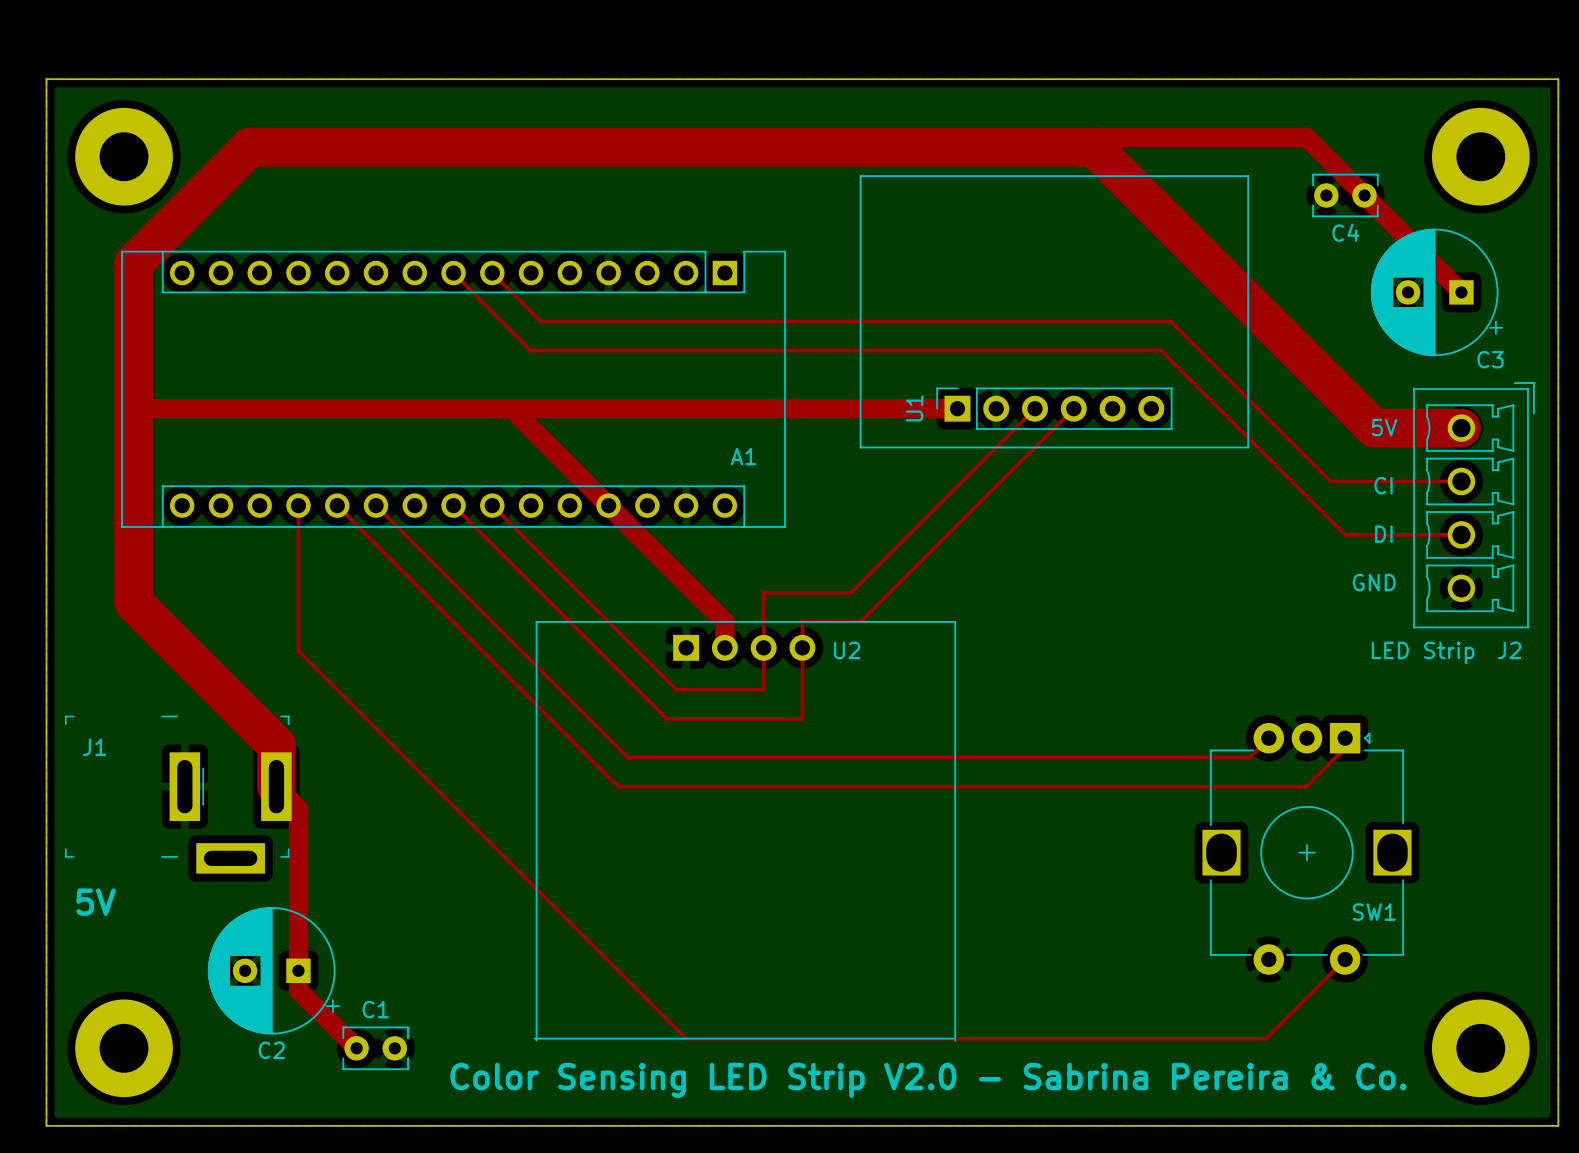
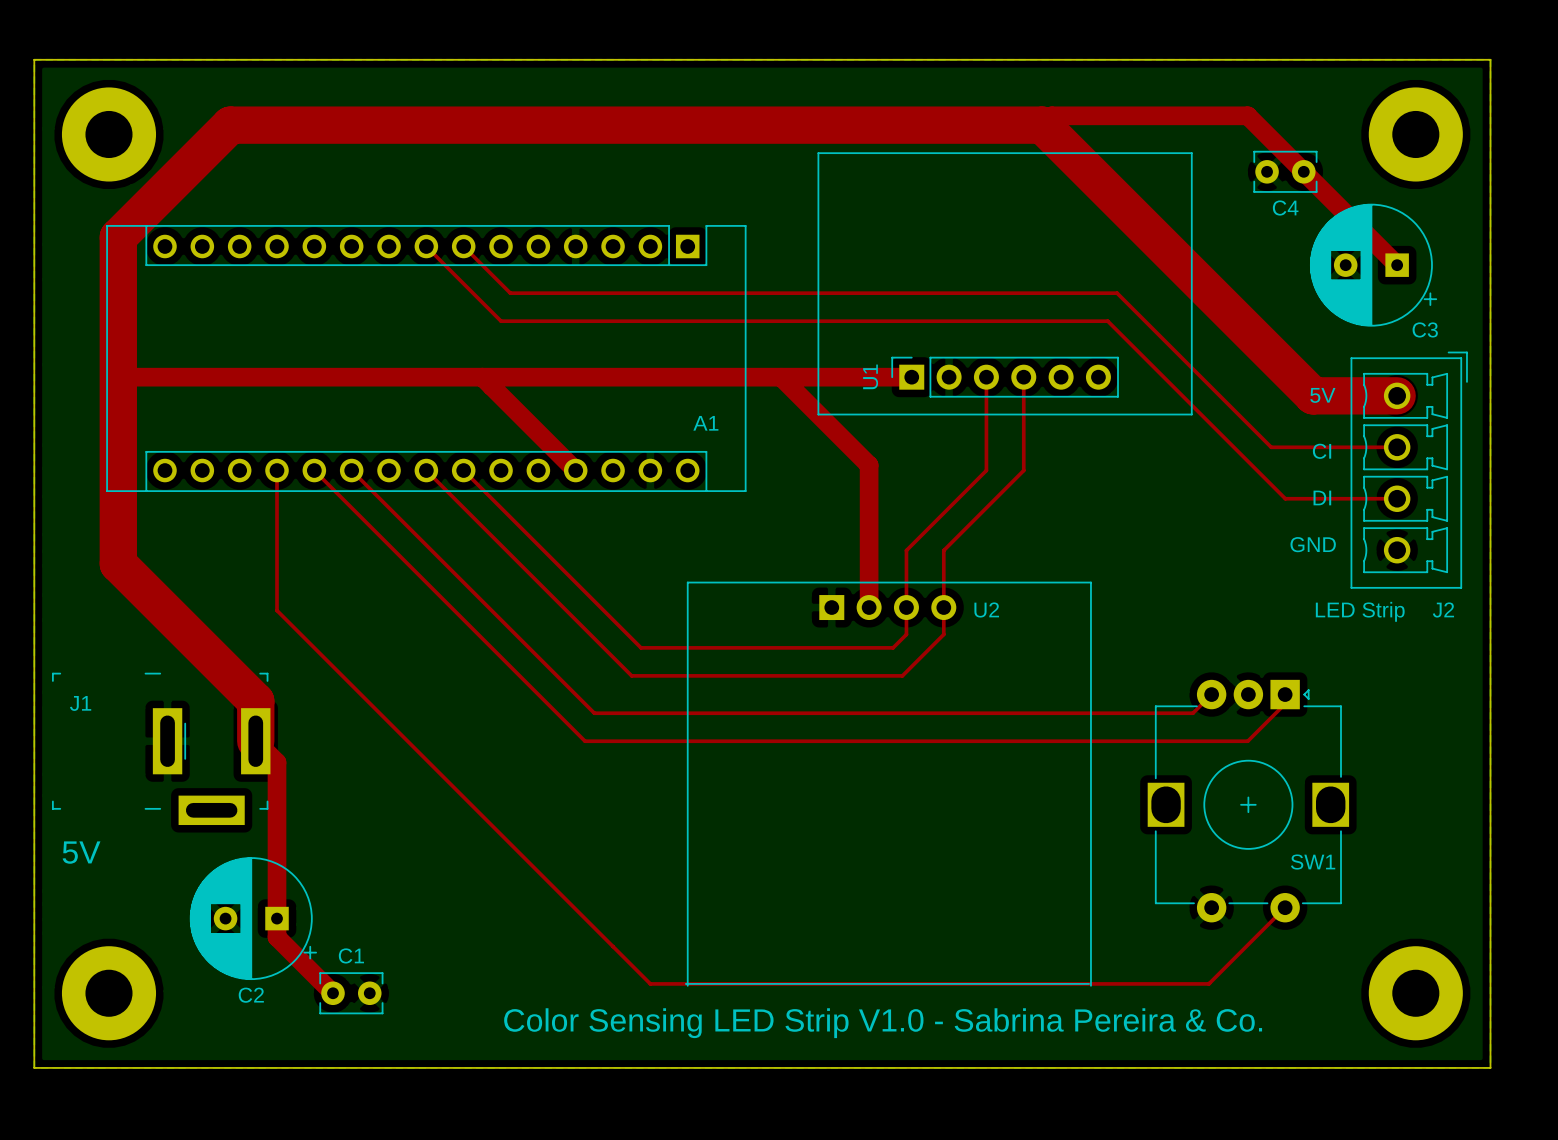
top track: none -> (781, 377) (869, 465) (869, 607)
top track: (1035, 408) (850, 592) (763, 592) (763, 689) -> (986, 377) (986, 470) (906, 550) (906, 634) (893, 647) (725, 647)
top track: (1073, 408) (860, 621) (802, 621) (802, 718) -> (1023, 377) (1023, 470) (943, 550) (943, 634) (902, 675) (762, 675)
top track: (608, 505) (724, 621) (724, 647) -> none
U2 position: (744, 831) -> (888, 784)
text: Color Sensing LED Strip V2.0 - Sabrina Pereira & Co. (928, 1080) -> Color Sensing LED Strip V1.0 - Sabrina Pereira & Co. (883, 1023)

